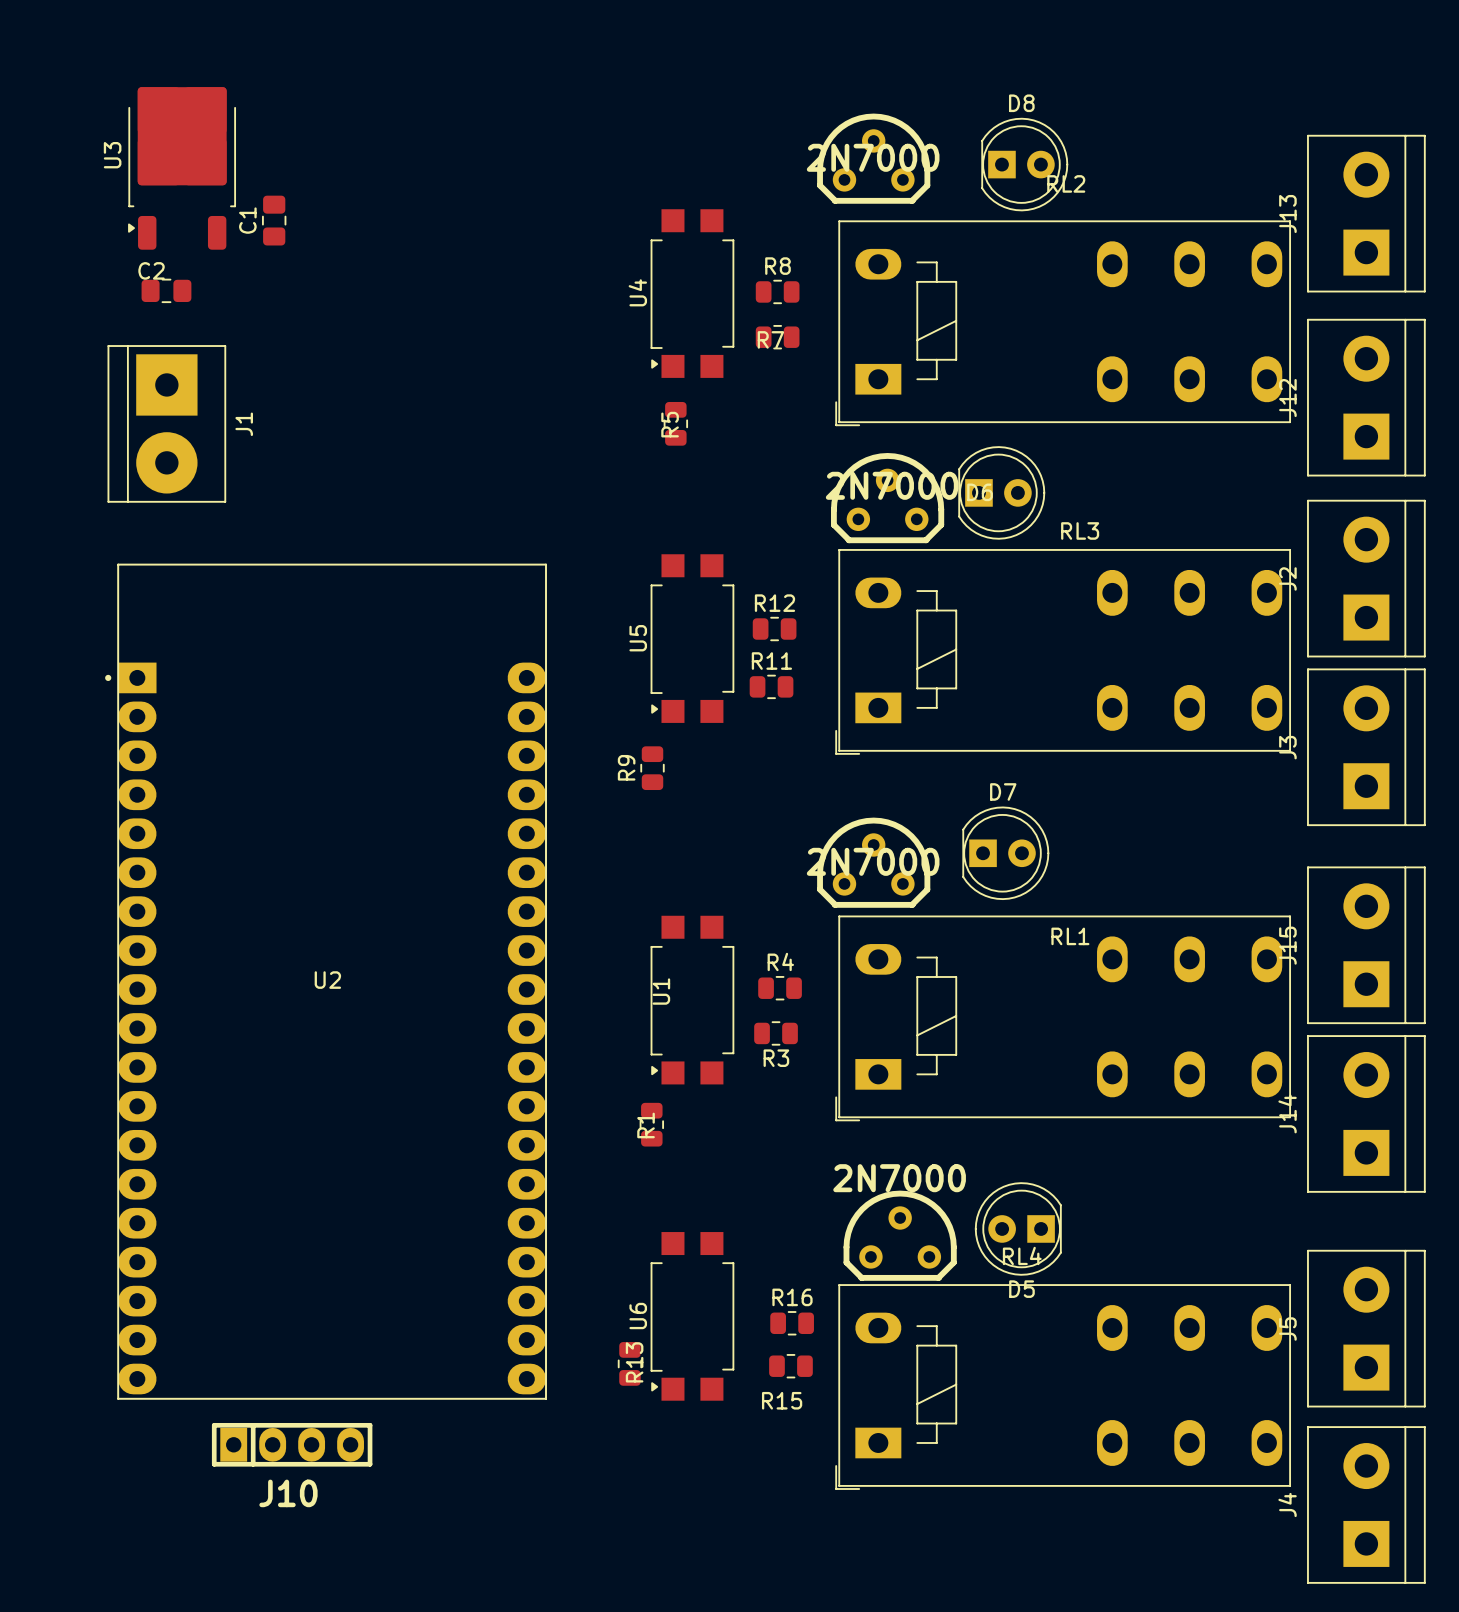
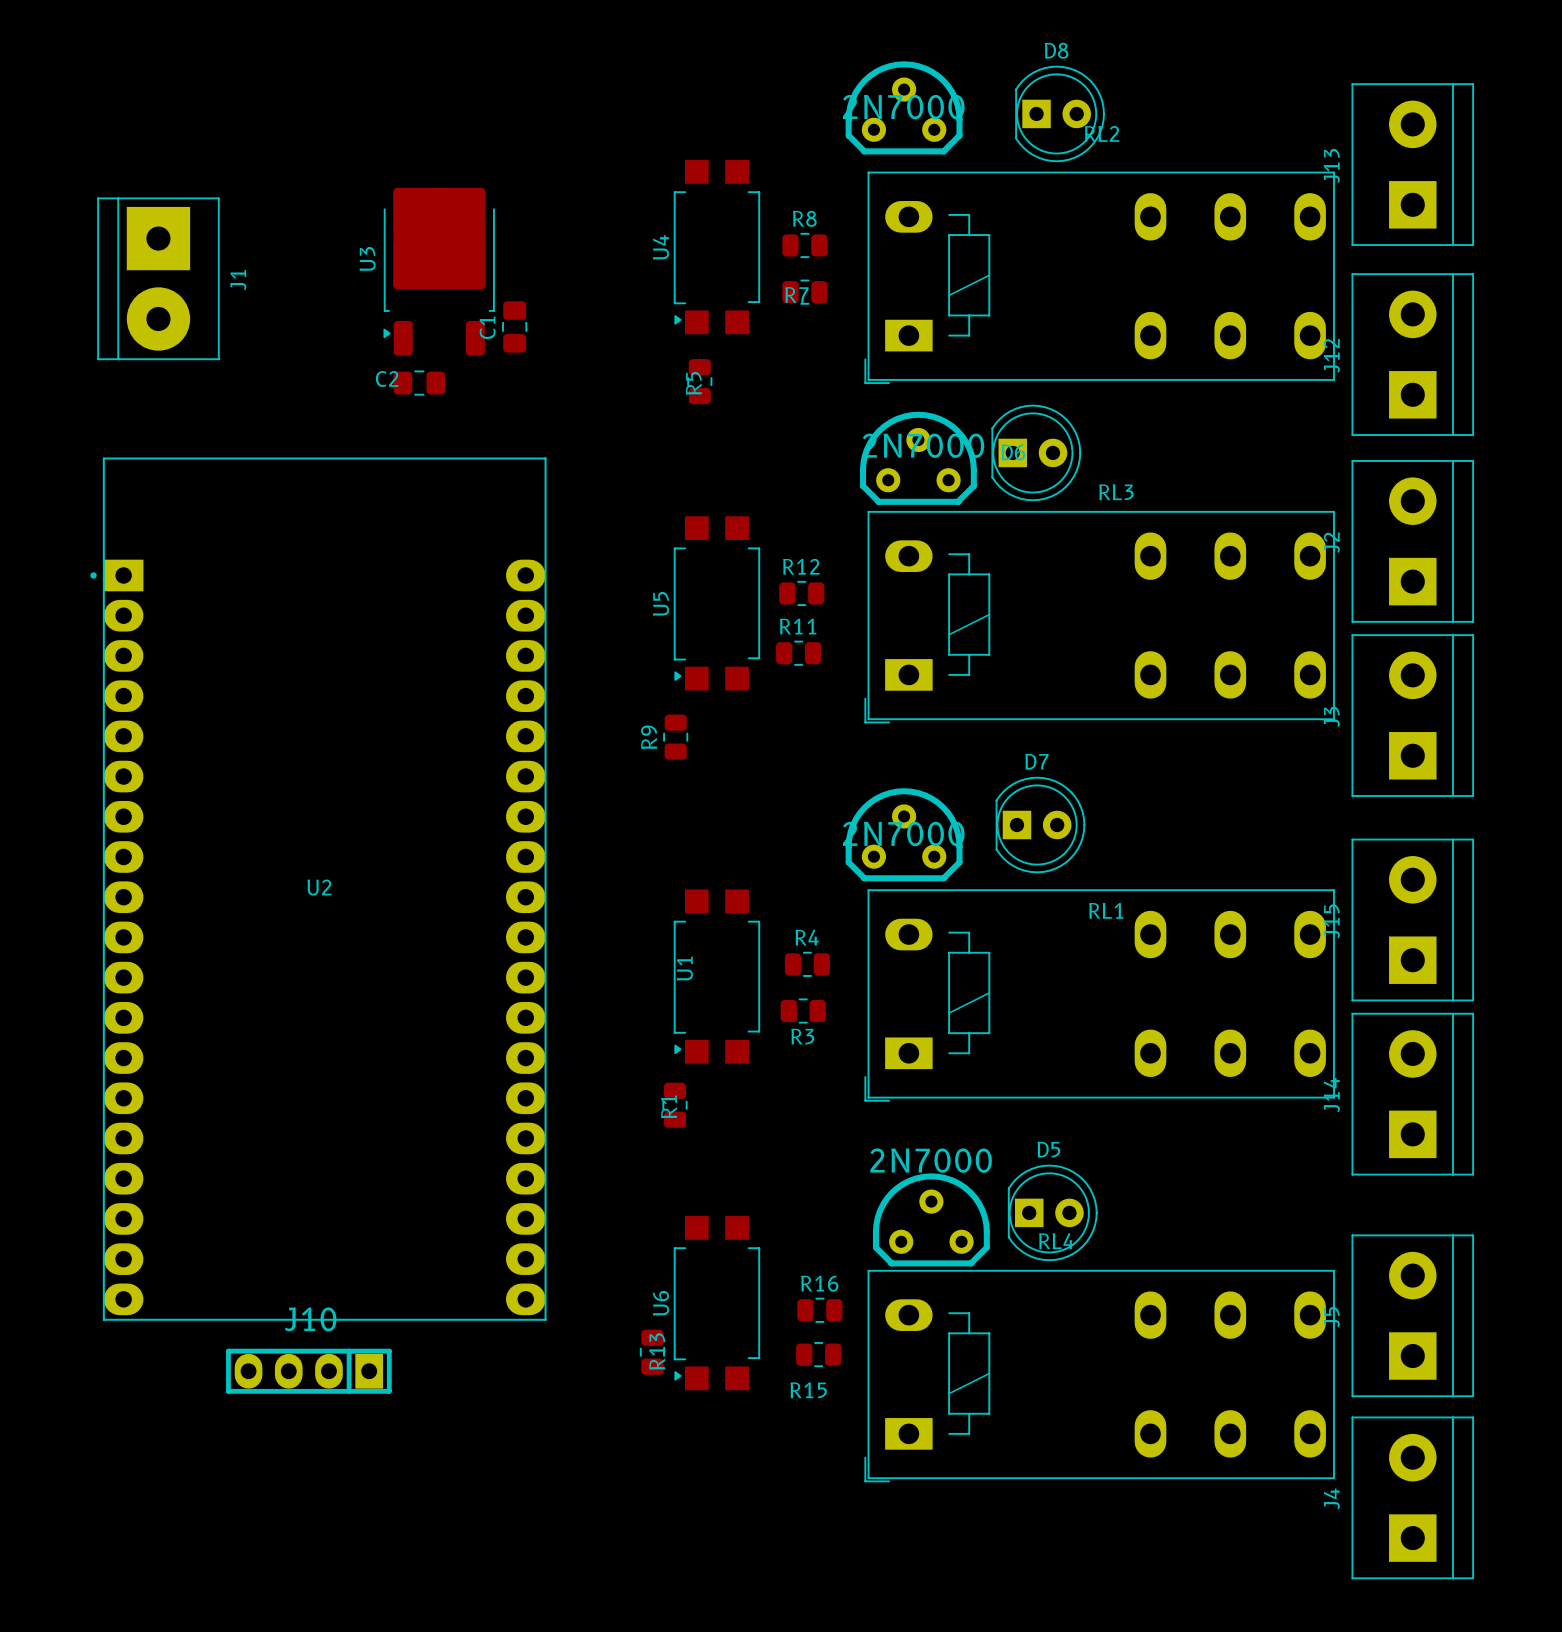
U3 position: (182, 168) -> (439, 271)
C1 position: (274, 220) -> (514, 326)
C2 name position: C2 (151, 270) -> C2 (387, 378)
C2 position: (166, 290) -> (419, 383)
J1 position: (166, 423) -> (158, 278)
U2 position: (326, 981) -> (318, 889)
D5 rotation: 0° (1018, 1228) -> 180° (1052, 1212)
J10 rotation: 0° (292, 1444) -> 180° (308, 1371)

